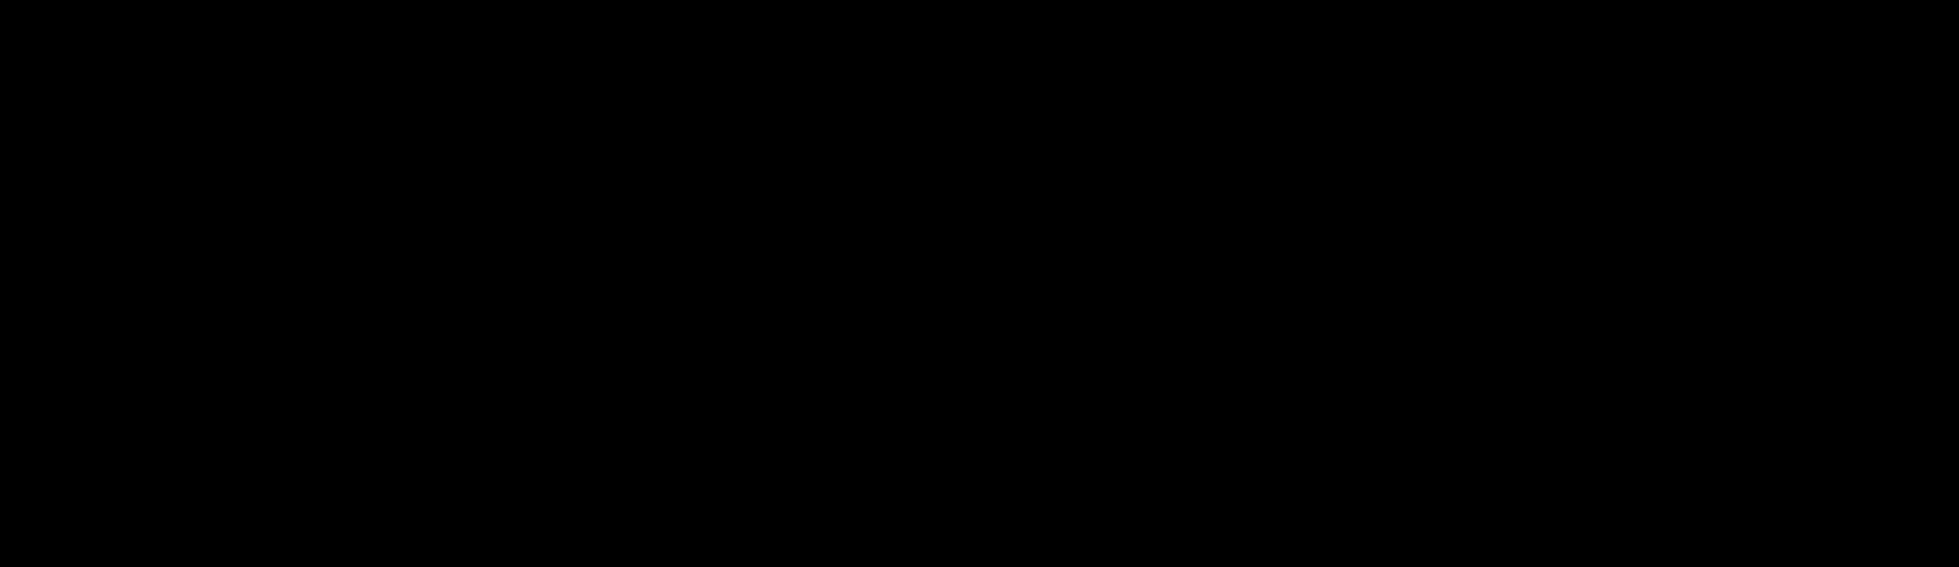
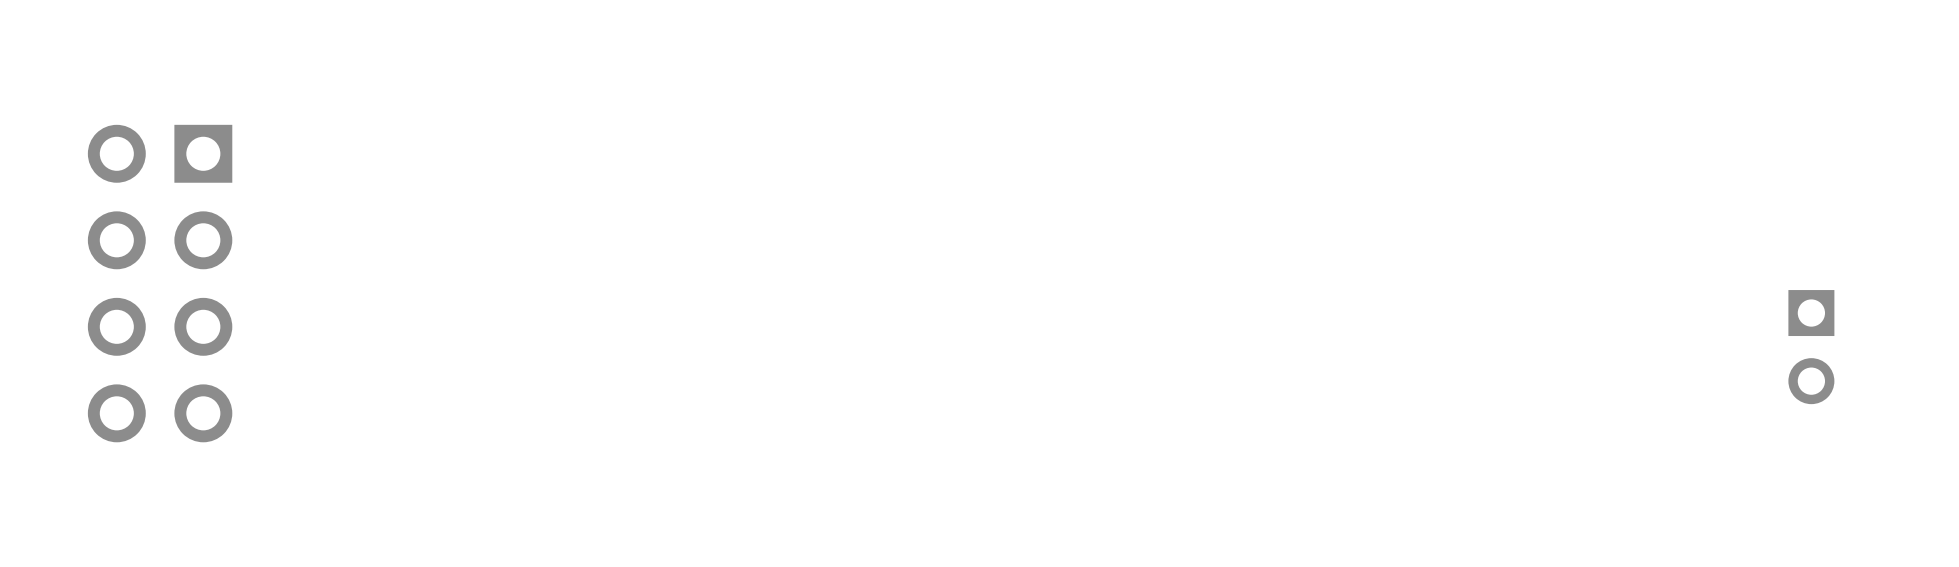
part: none -> (160, 283)
part: none -> (1811, 347)

